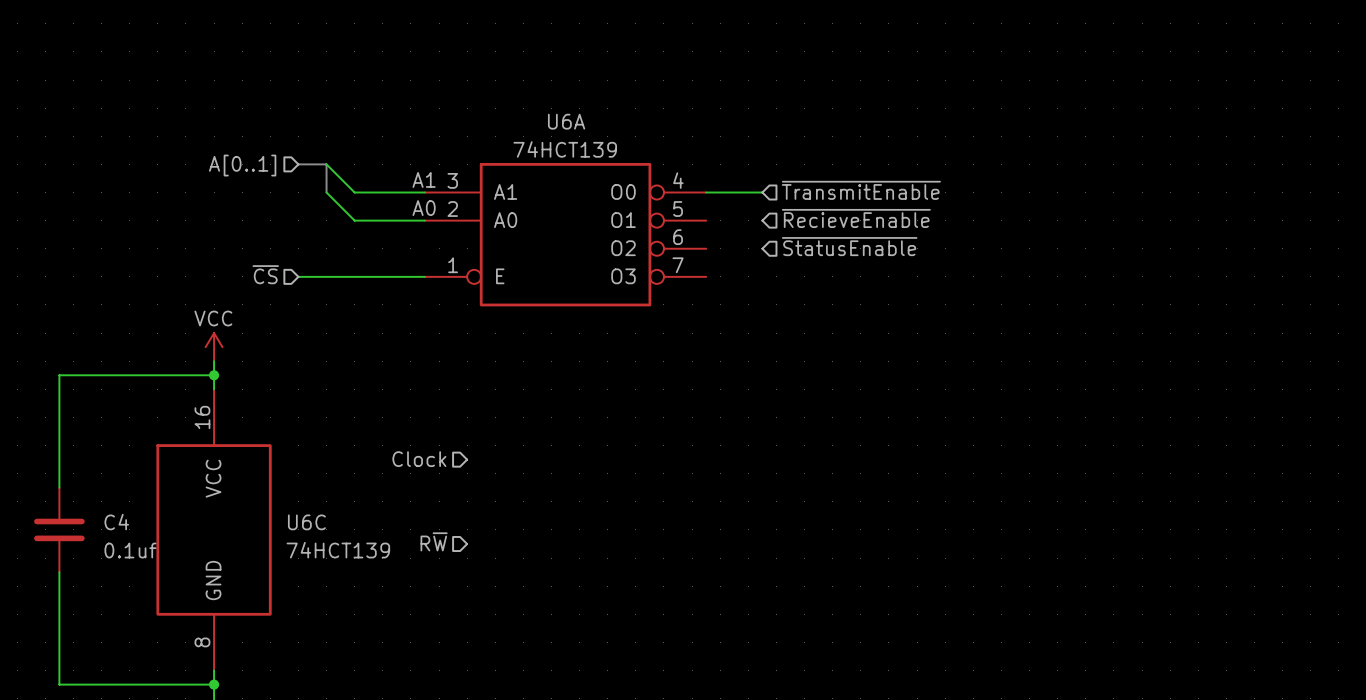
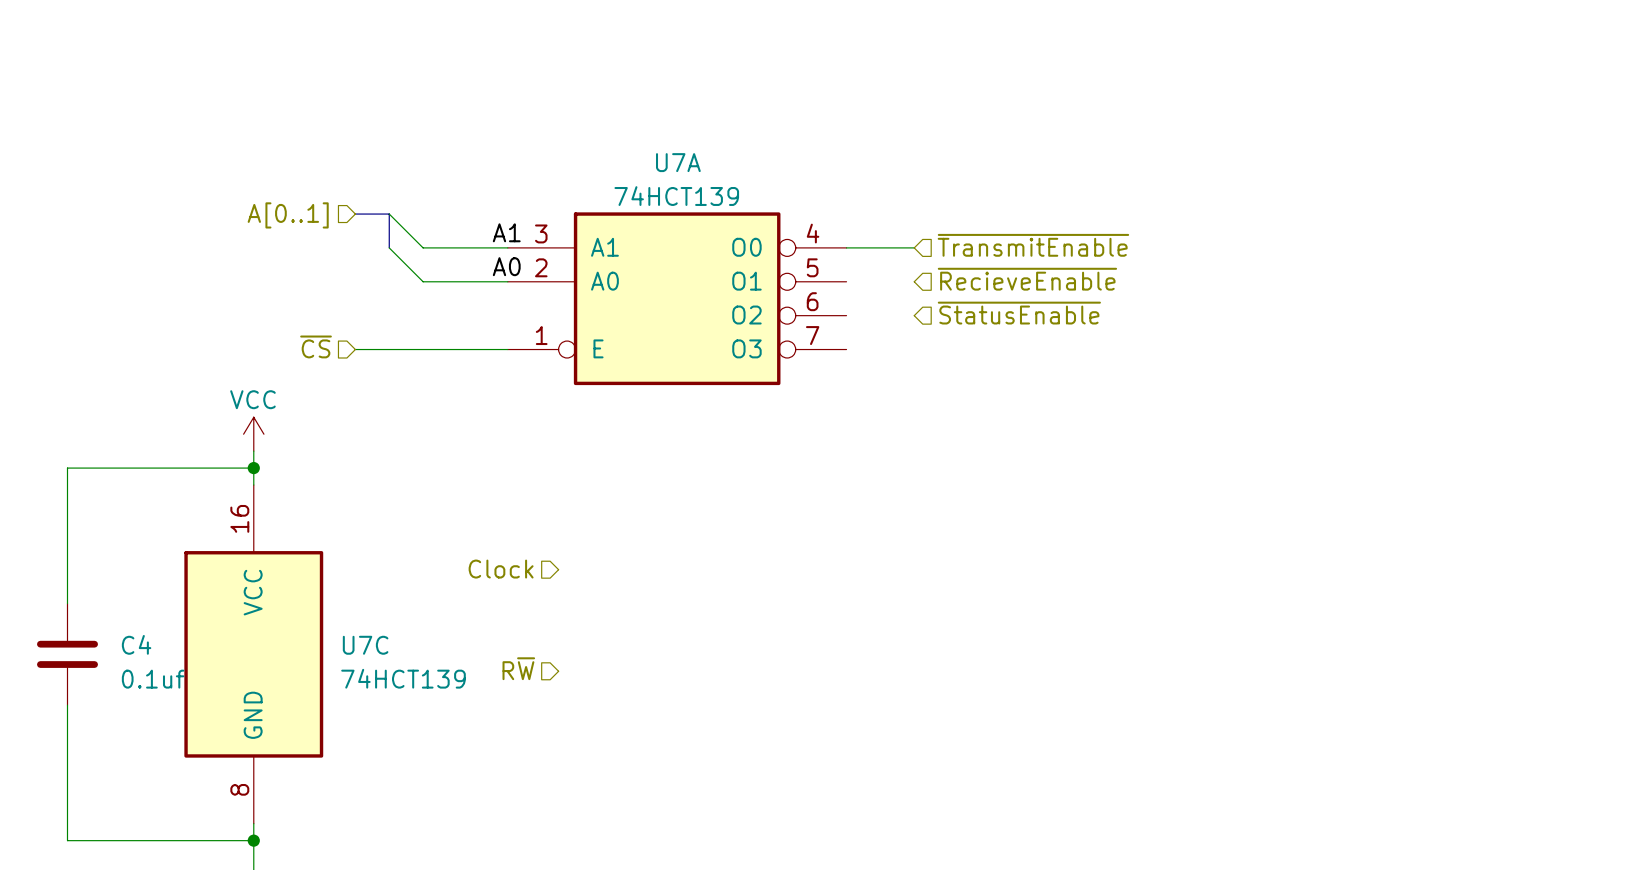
U6A name: U6A (566, 121) -> U7A (678, 162)
U6C name: U6C (306, 522) -> U7C (365, 645)

